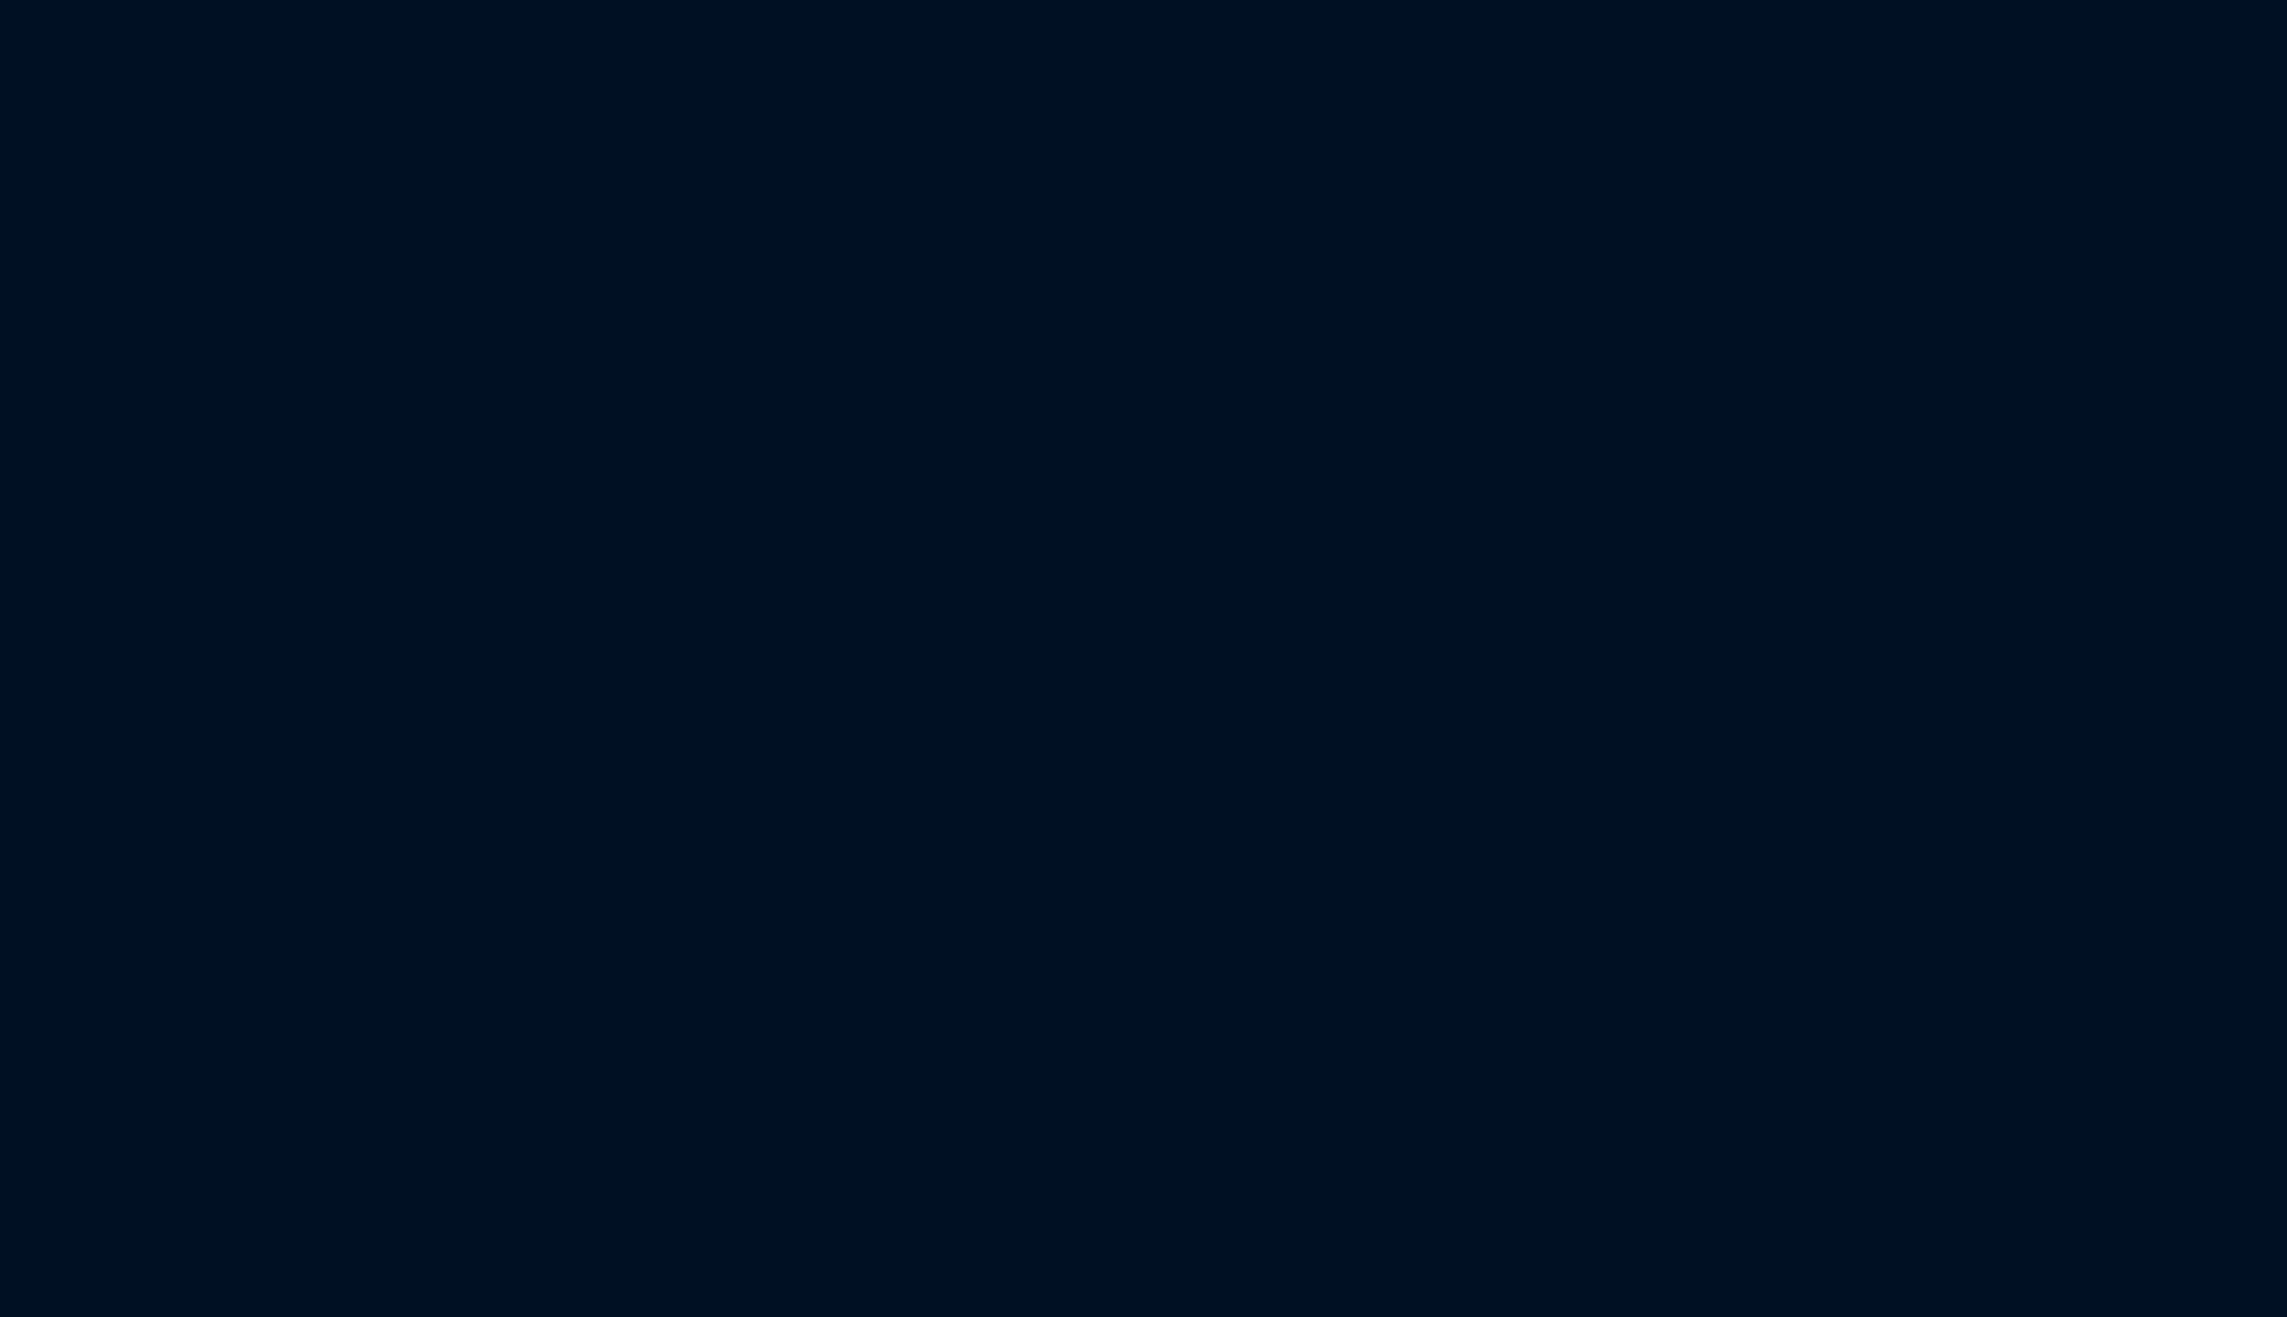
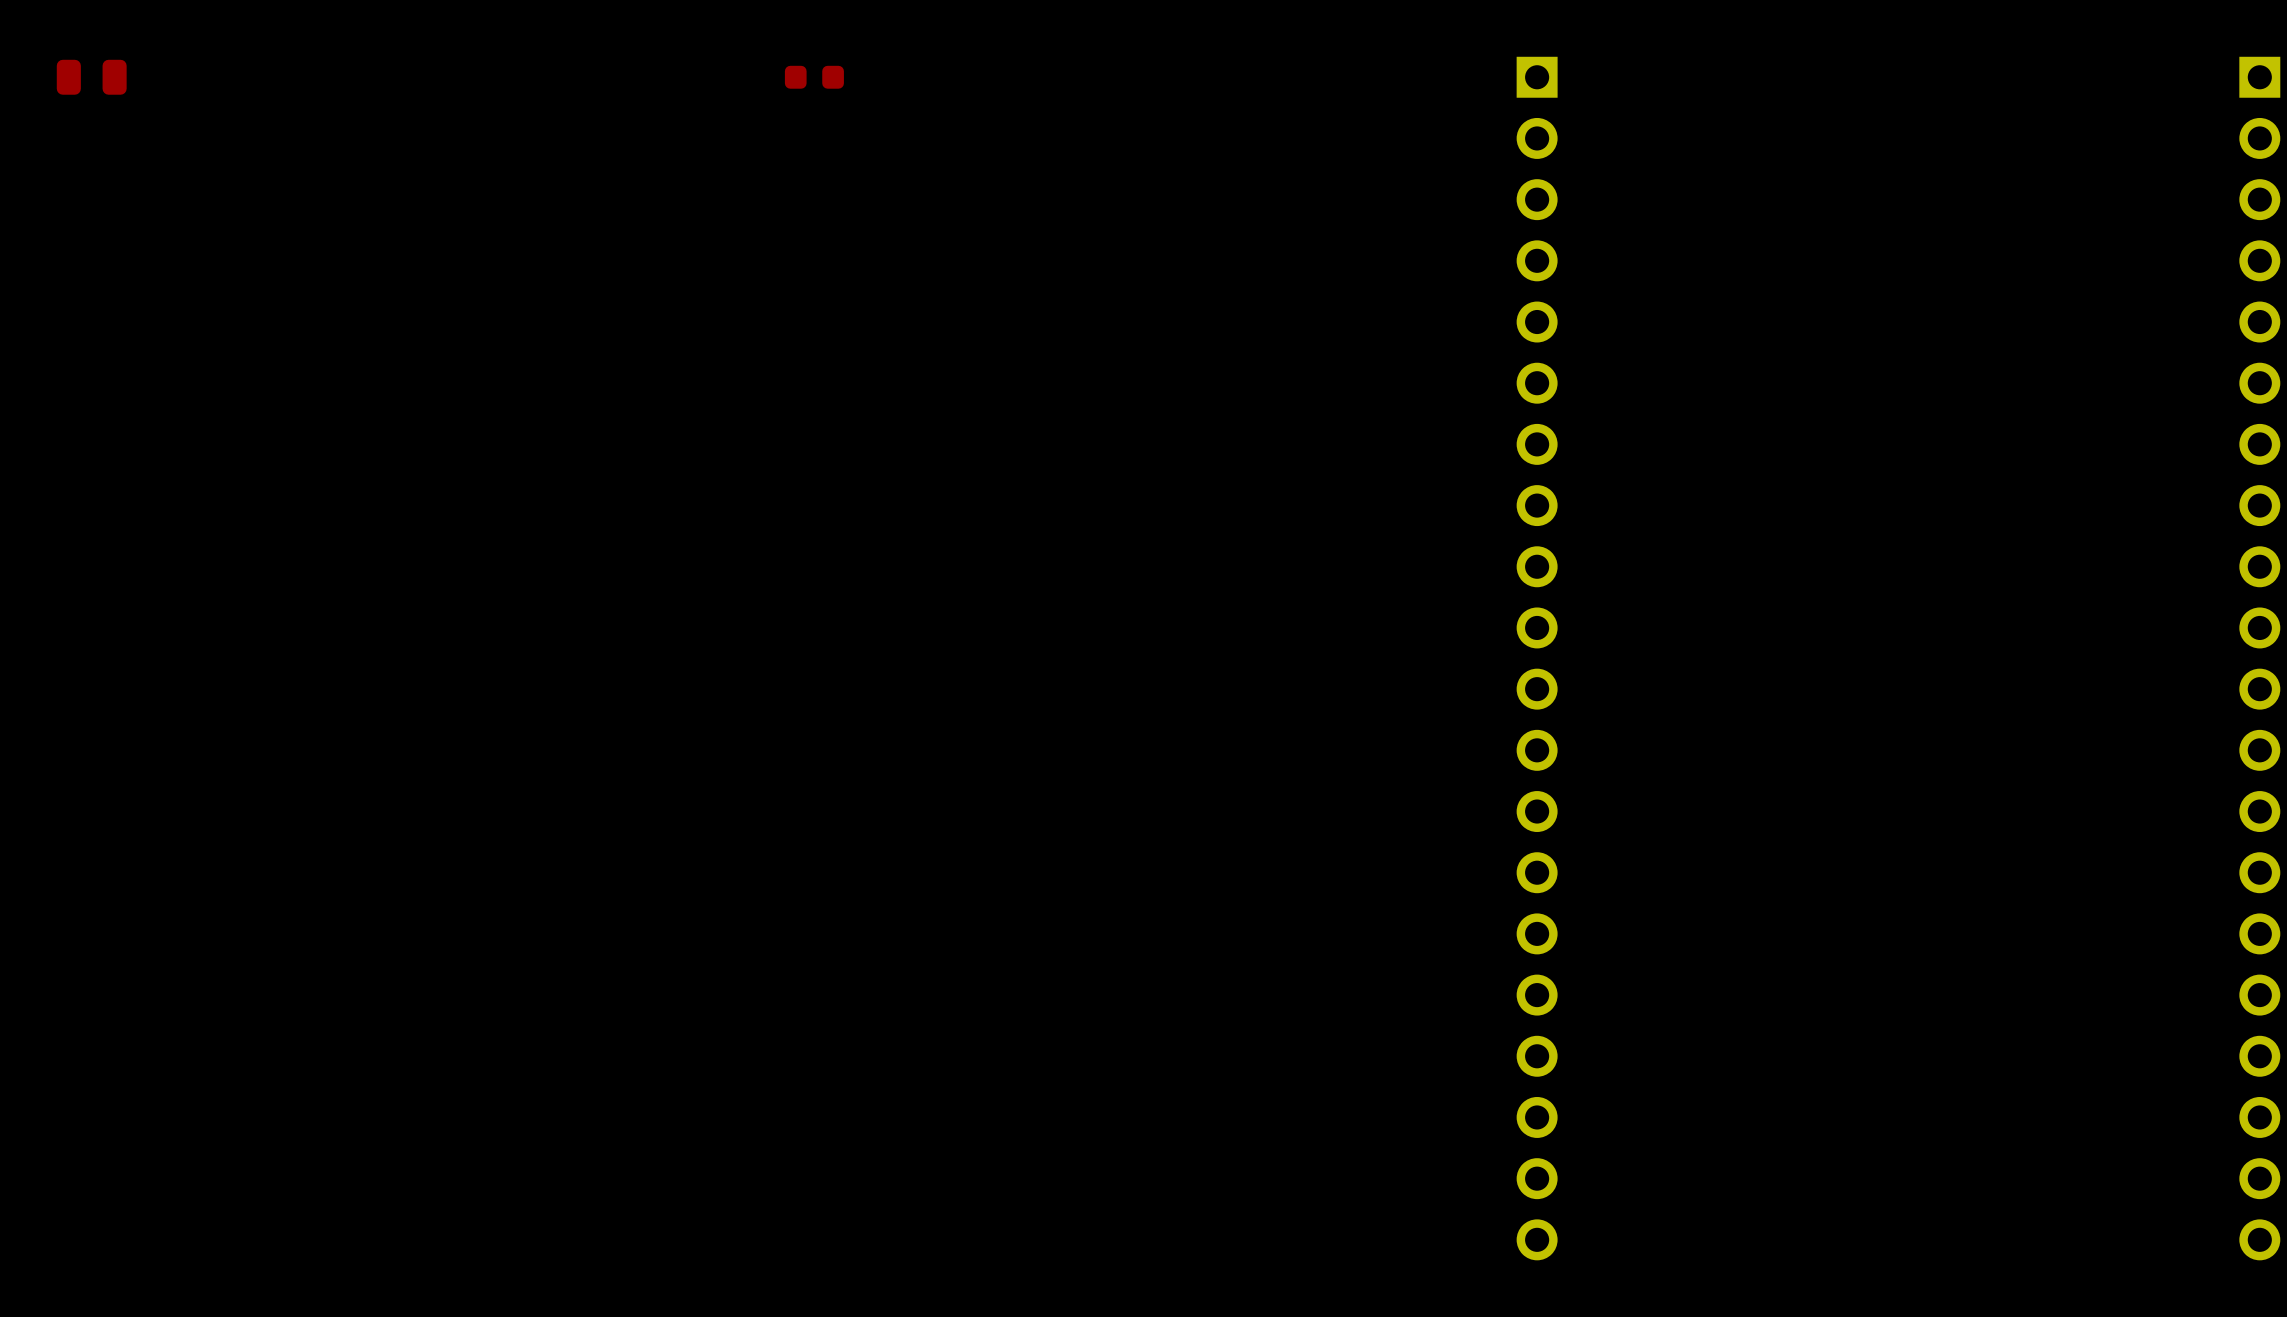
part: none -> (91, 77)
part: none -> (814, 77)
part: none -> (1537, 658)
part: none -> (2259, 658)

